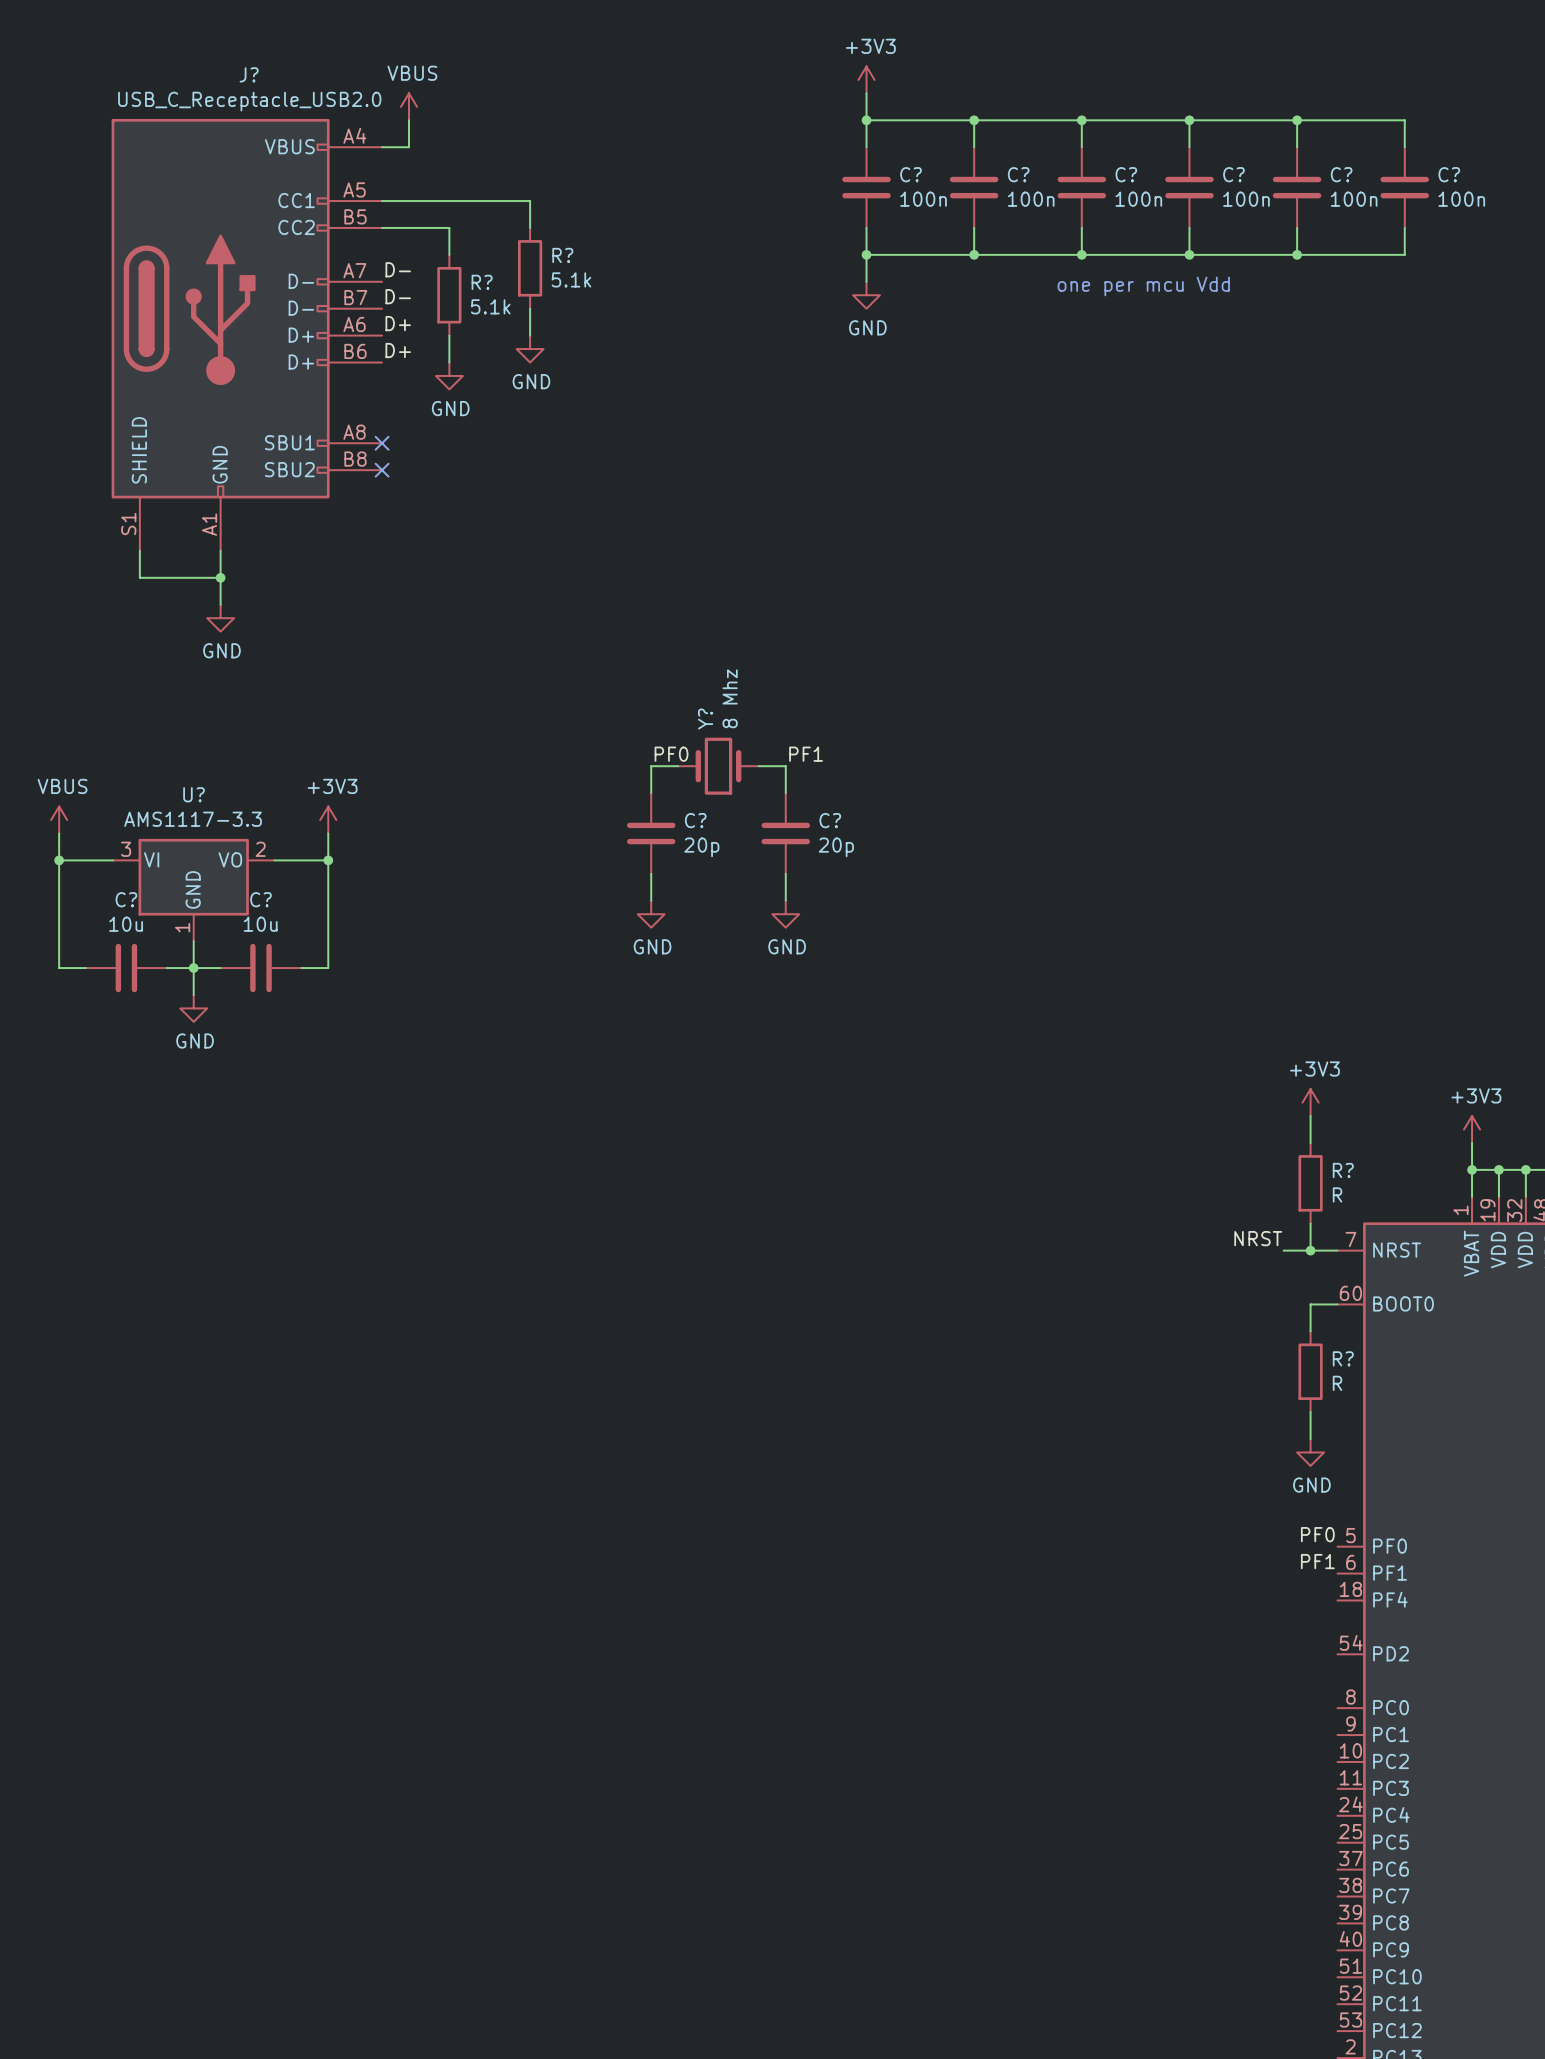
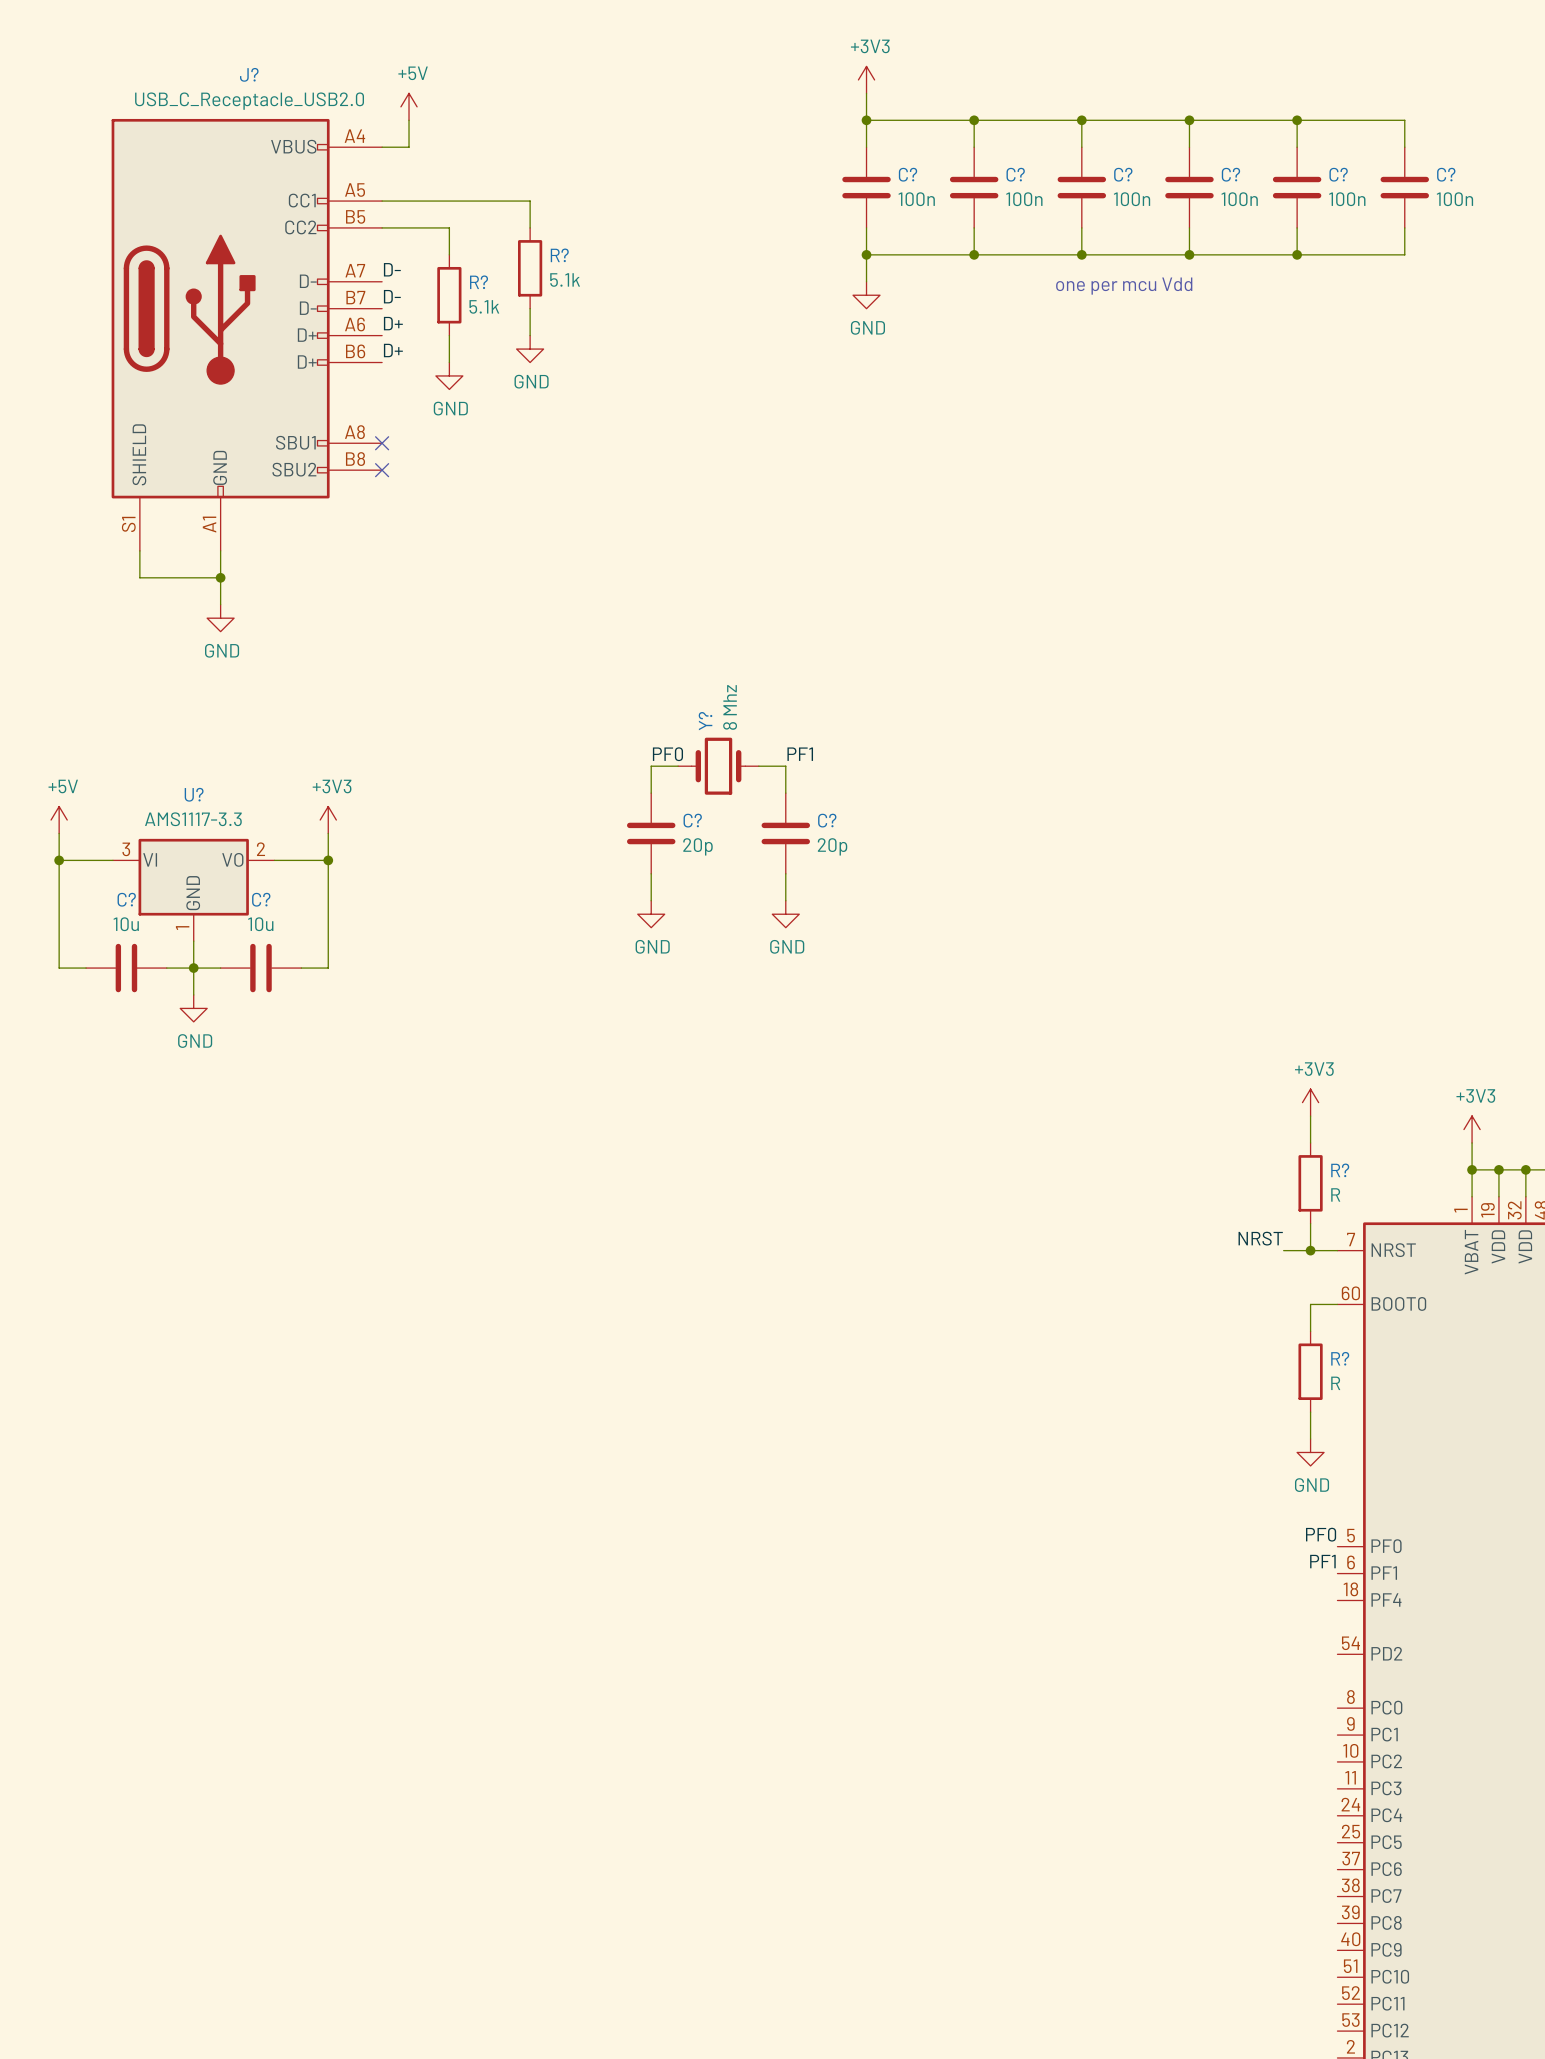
power symbol: VBUS (409, 106) -> +5V (409, 106)
power symbol: VBUS (59, 820) -> +5V (59, 820)

